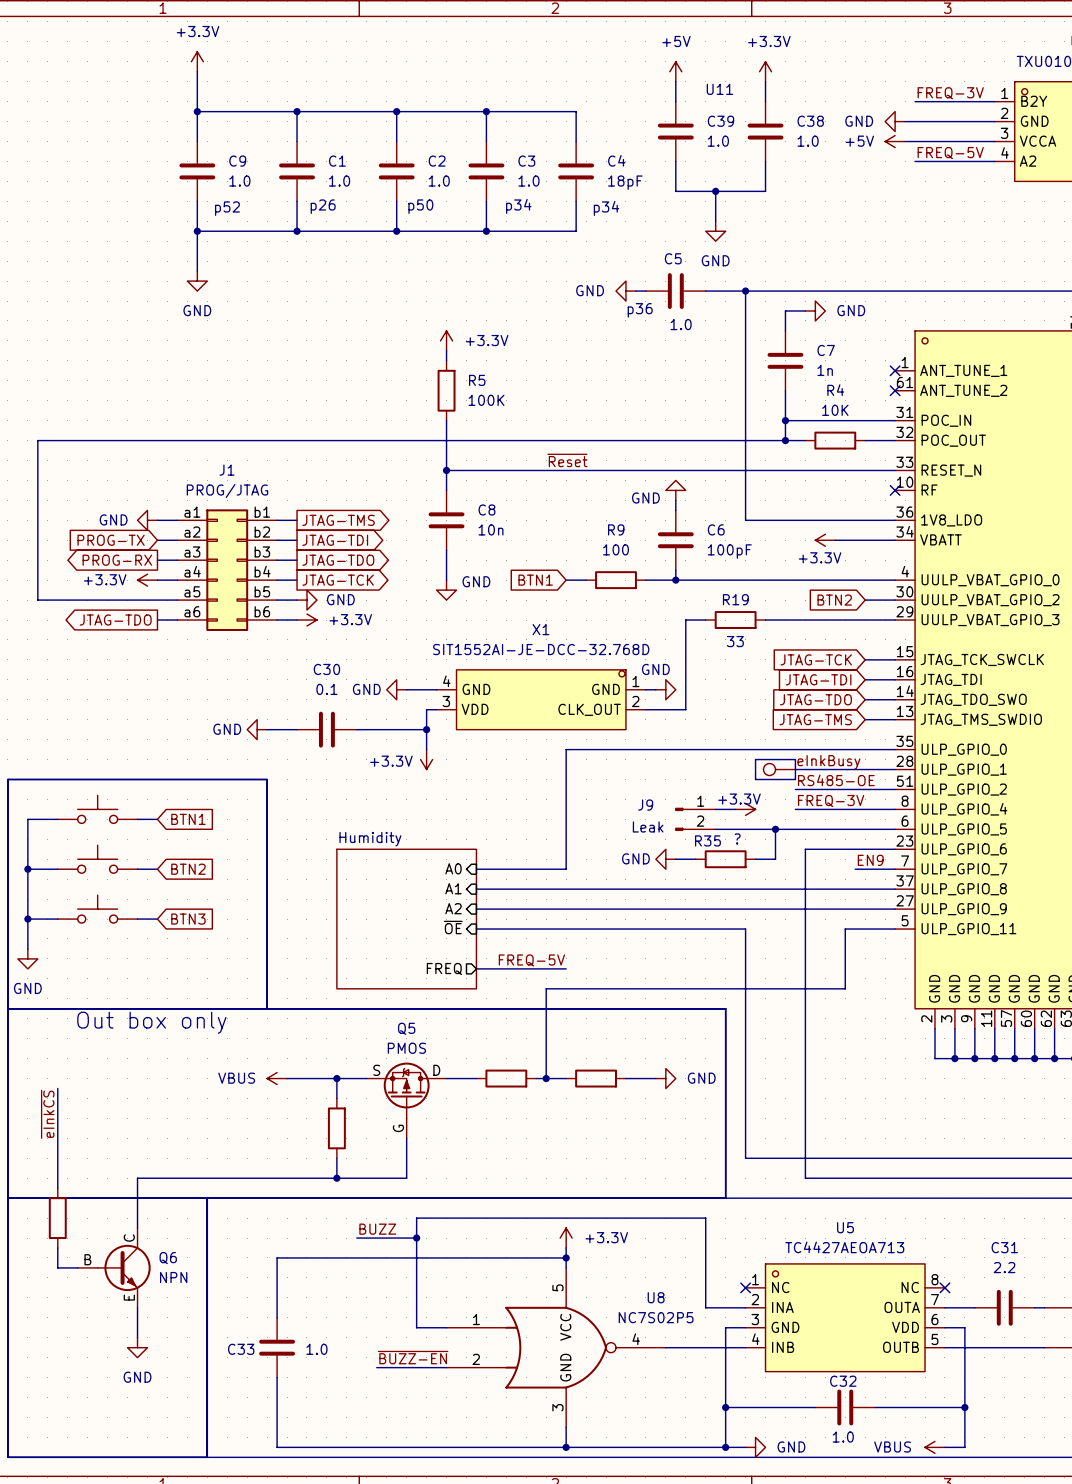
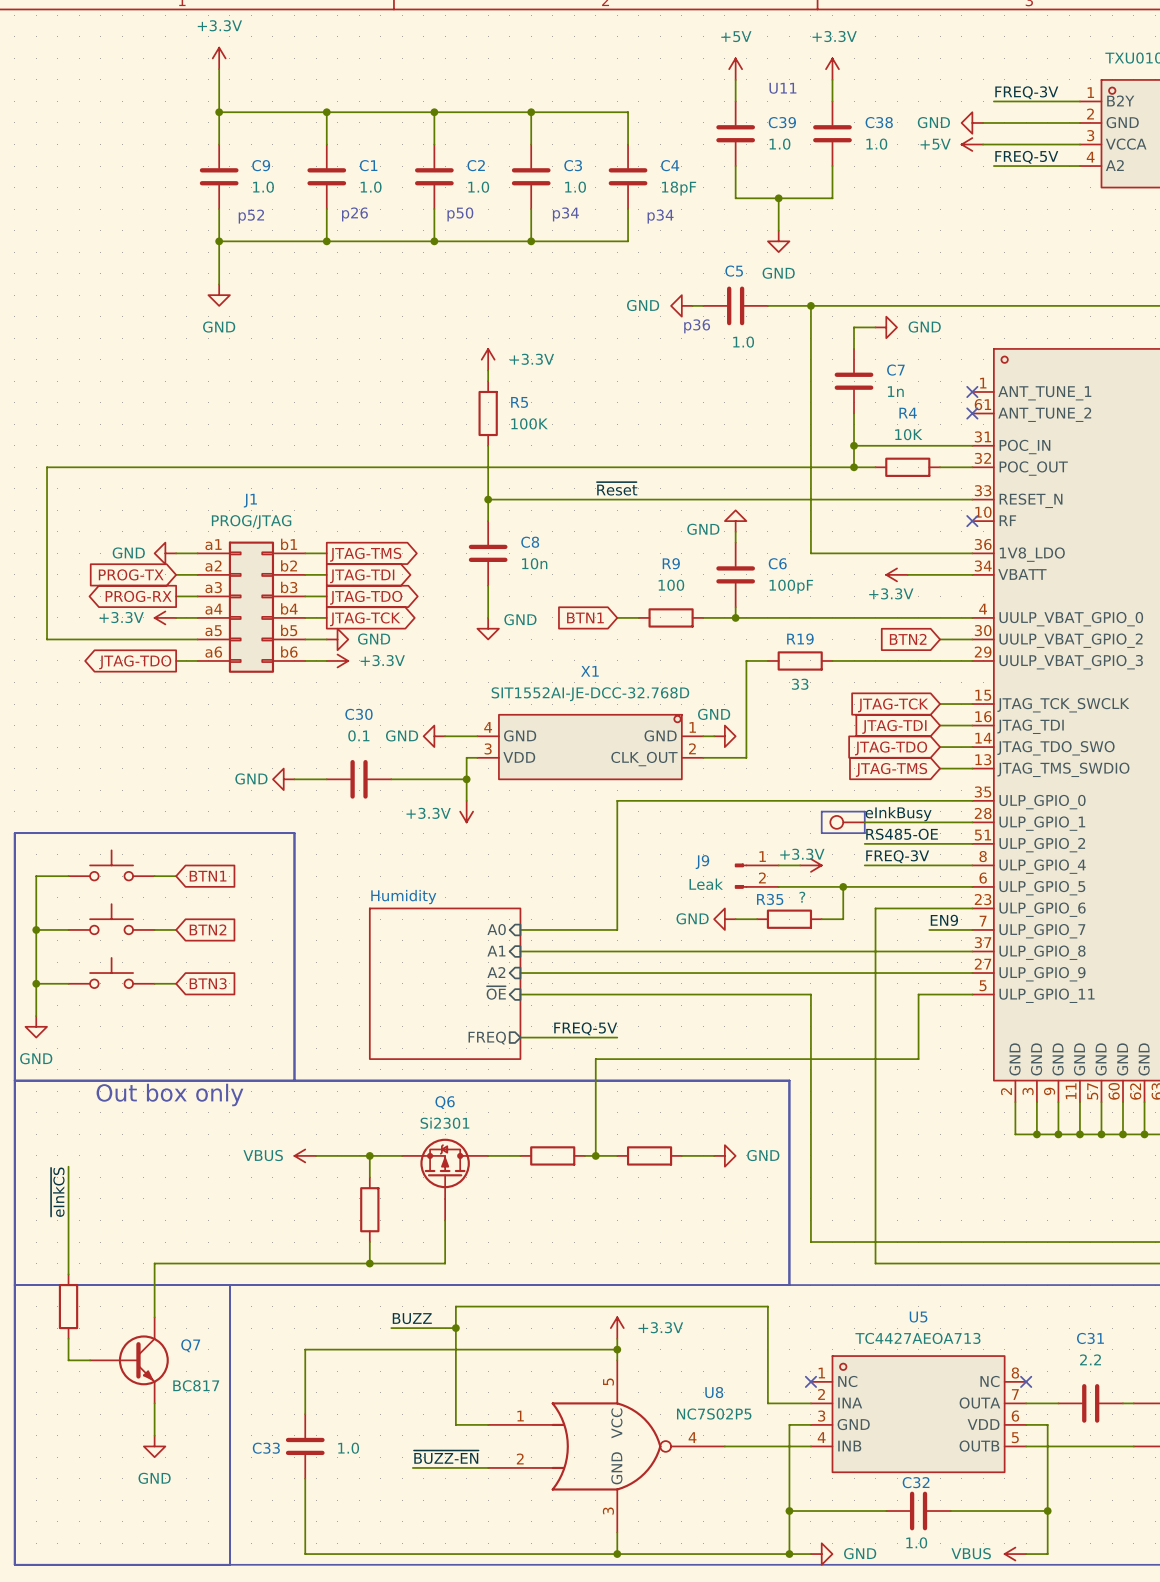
Q5: PMOS (406, 1100) -> none
Q6 symbol: [77, 1228, 151, 1308] -> [402, 1138, 489, 1221]
Q6 name position: Q6 (168, 1258) -> Q6 (445, 1102)
Q7: none -> BC817 (129, 1360)
Q6 value: NPN (173, 1277) -> Si2301 (444, 1123)

